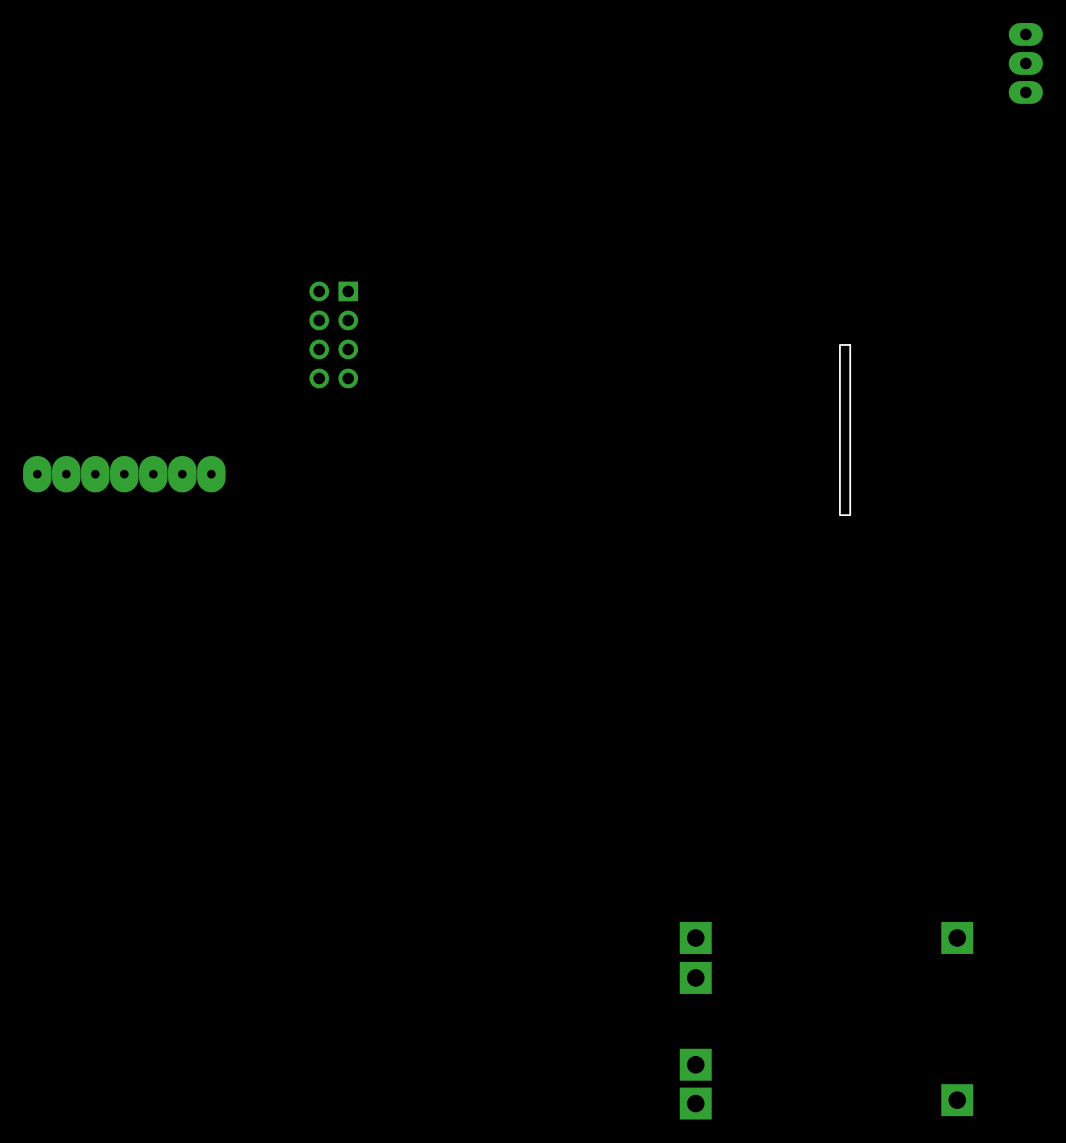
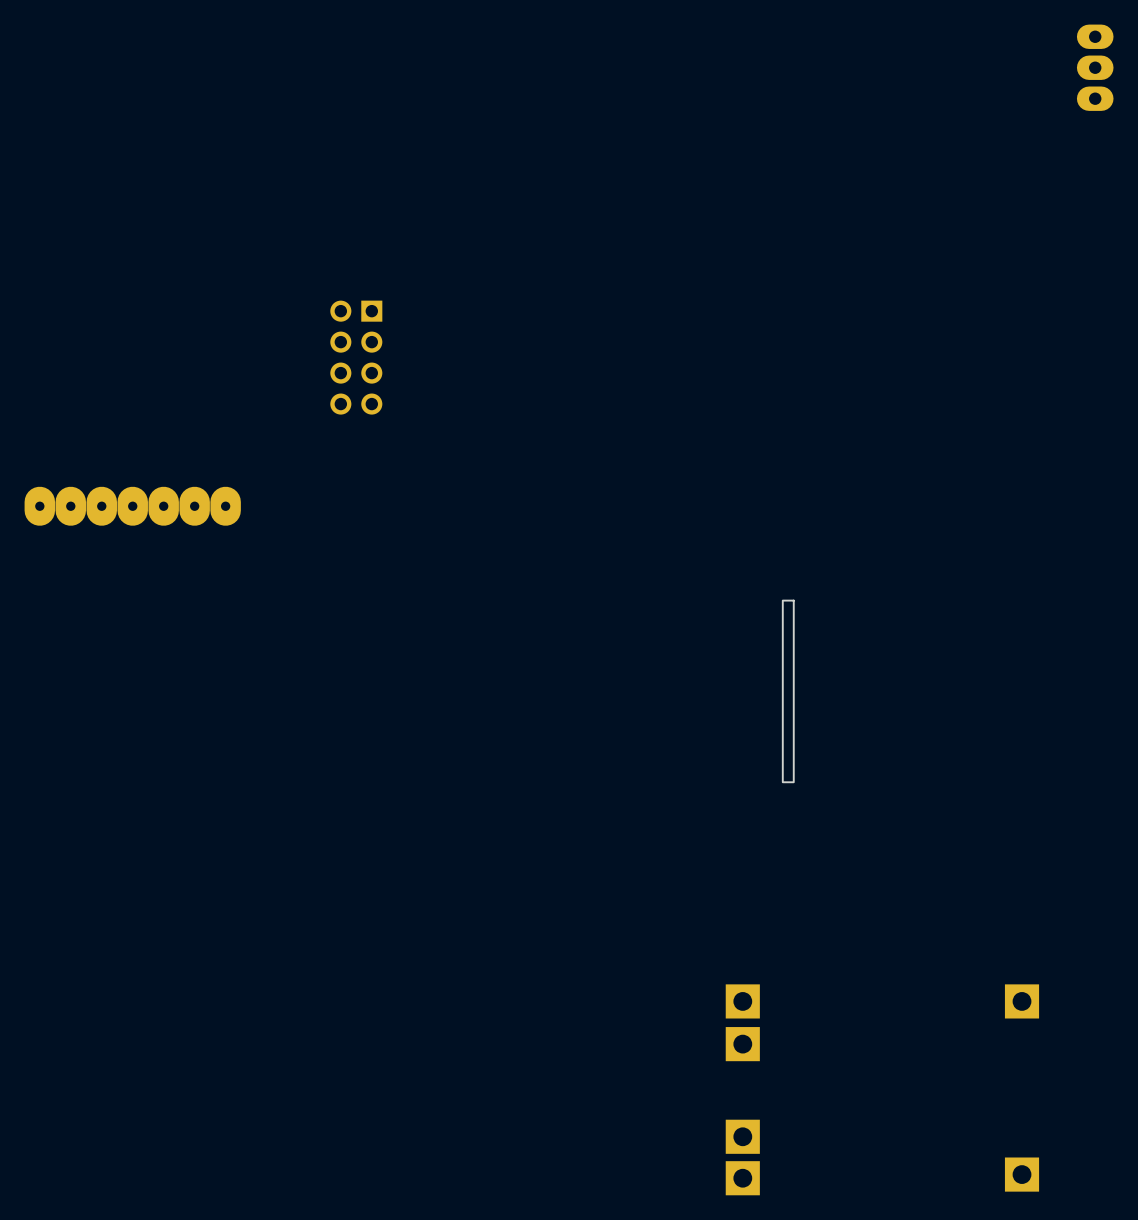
part position: (845, 430) -> (788, 691)

